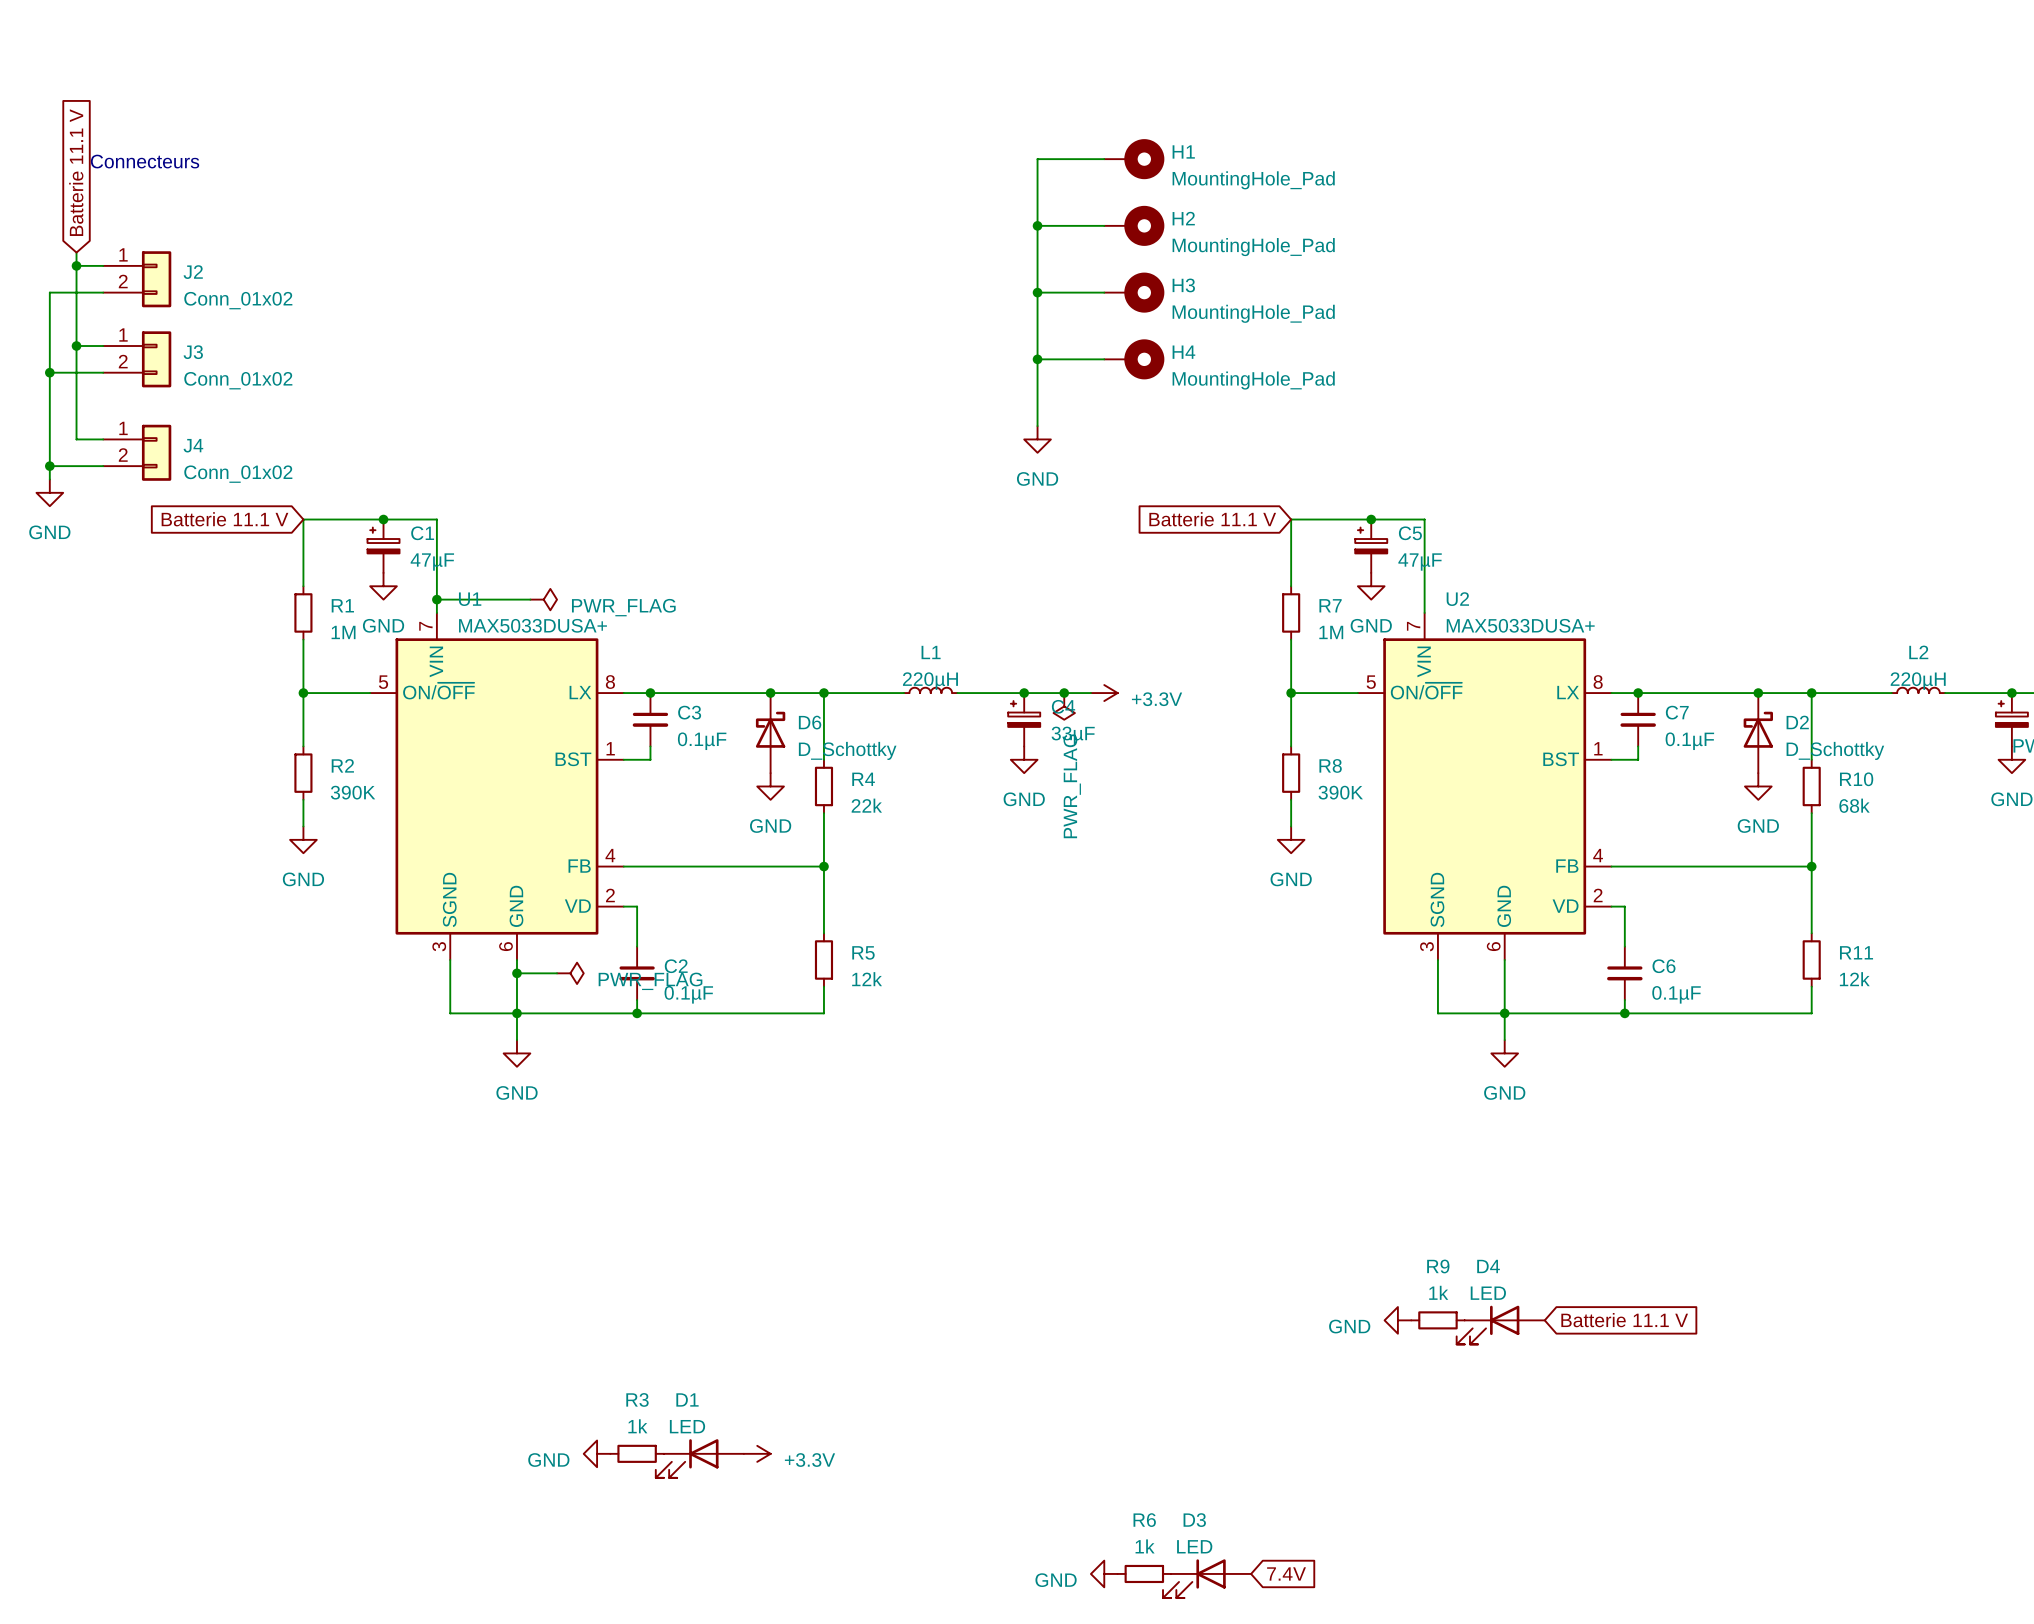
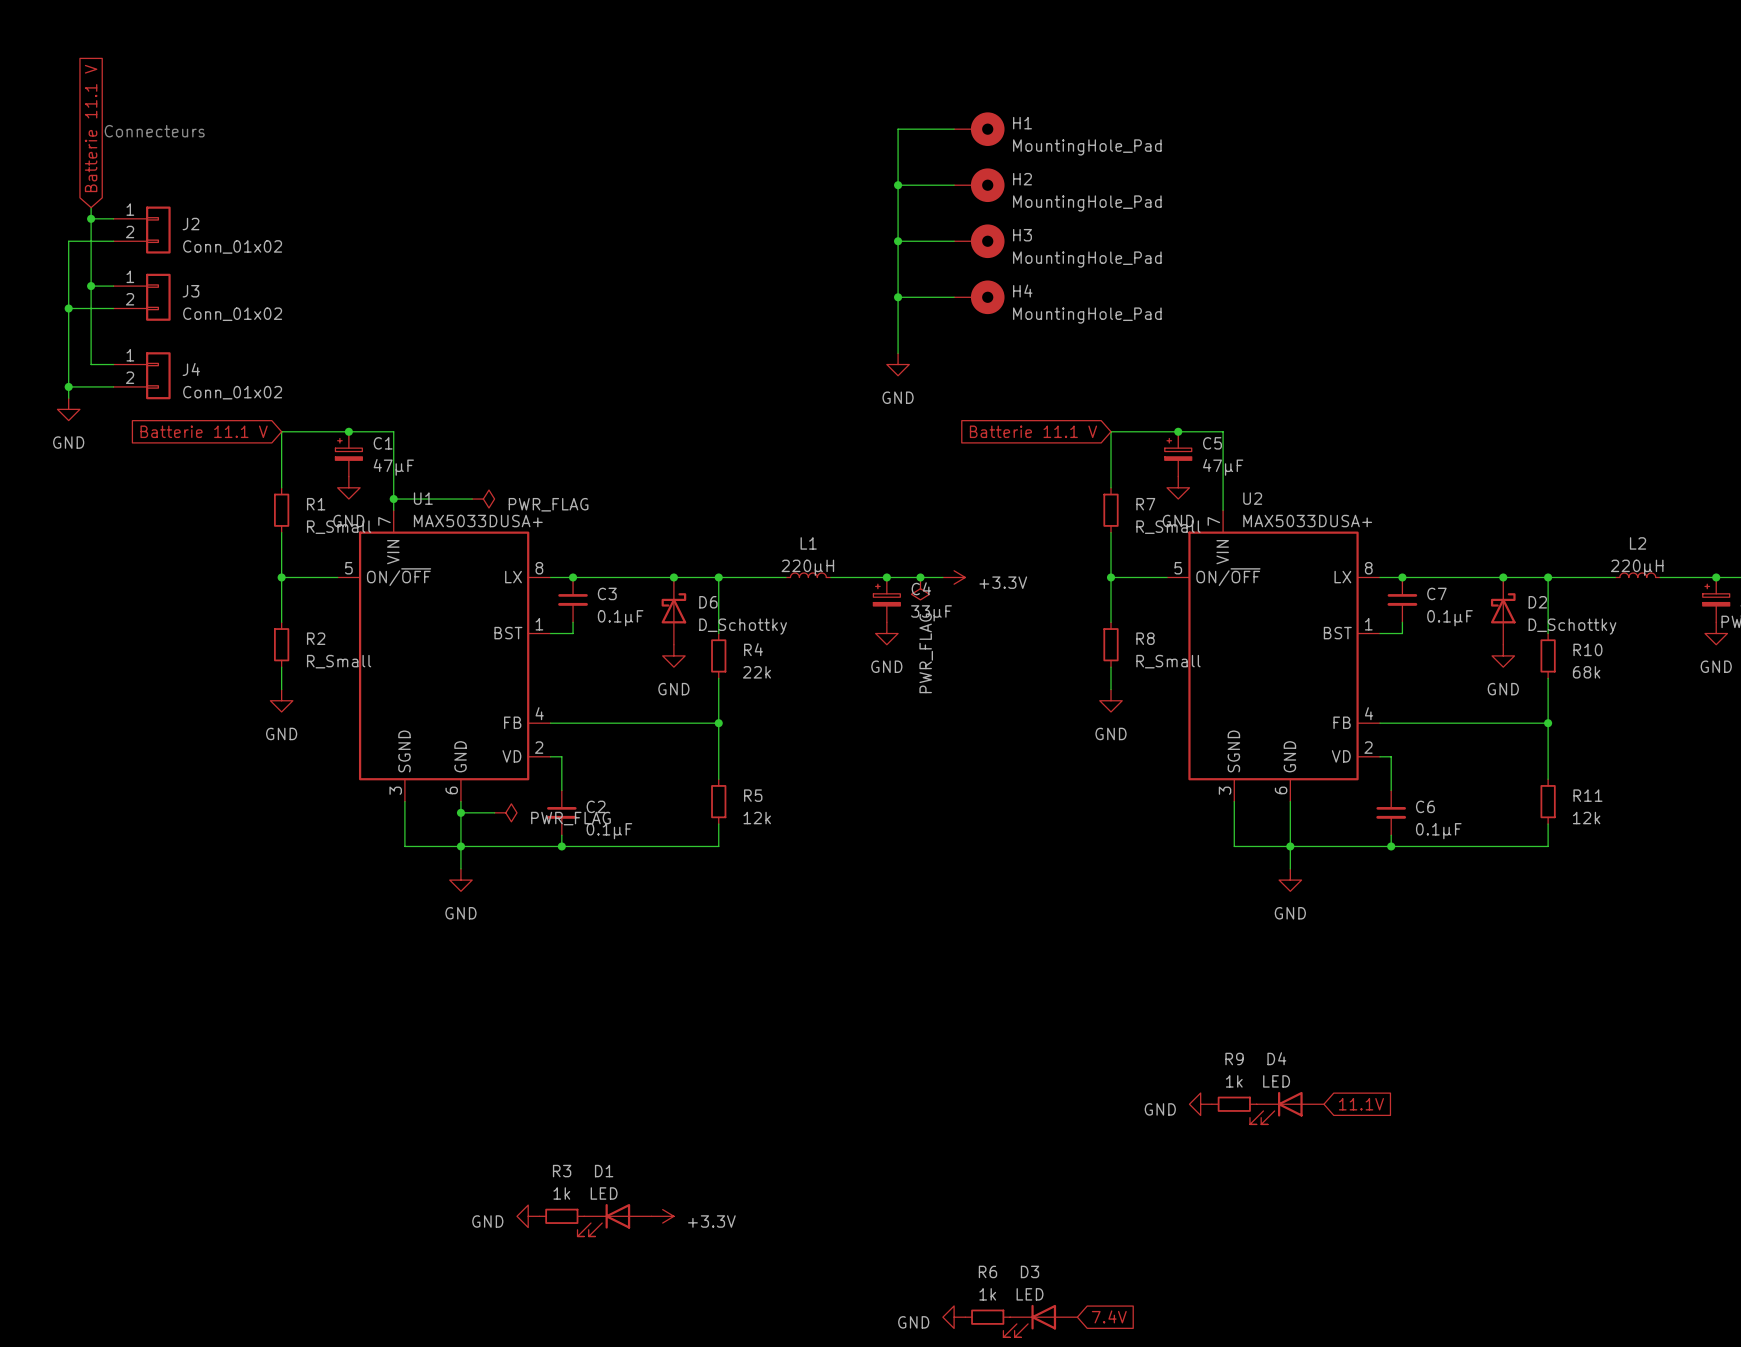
R1 value: 1M (343, 632) -> R_Small (339, 527)
R7 value: 1M (1331, 632) -> R_Small (1168, 527)
R2 value: 390K (353, 792) -> R_Small (339, 661)
R8 value: 390K (1340, 792) -> R_Small (1168, 661)
global label: Batterie 11.1 V (1624, 1320) -> 11.1V (1361, 1104)

